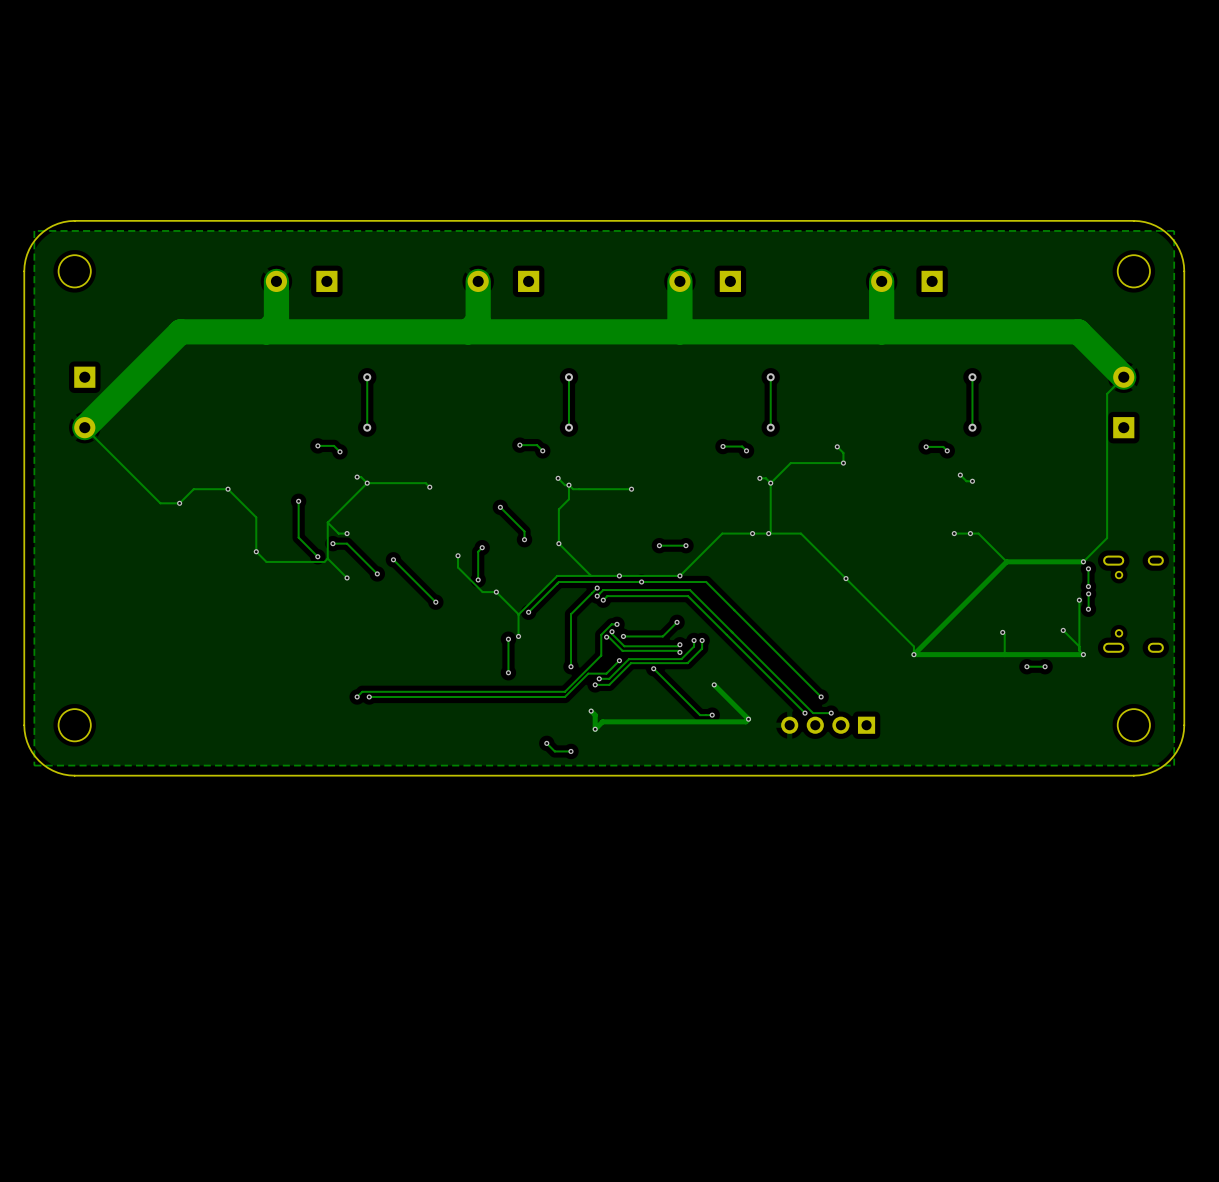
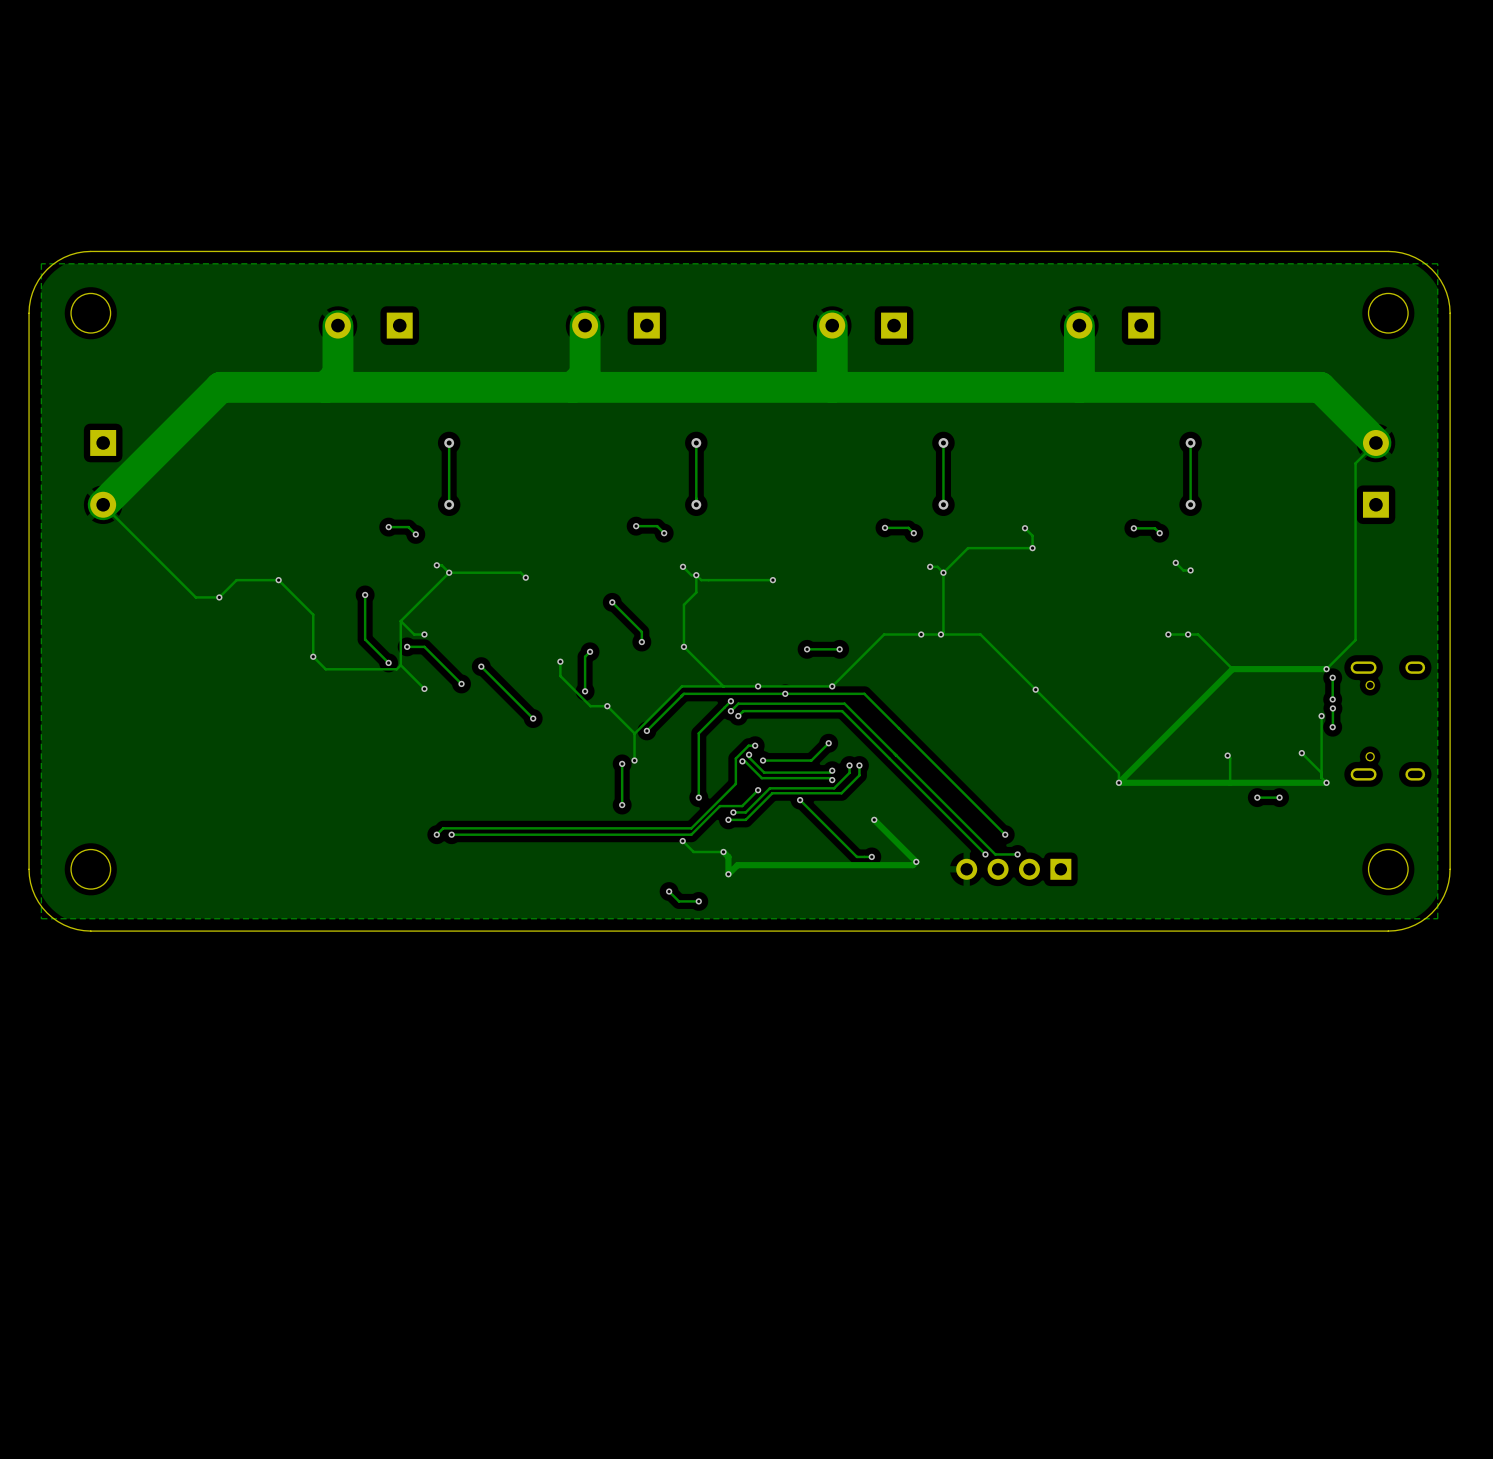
track: none -> (682, 841) (693, 852) (723, 852)
via: none -> (682, 841)

